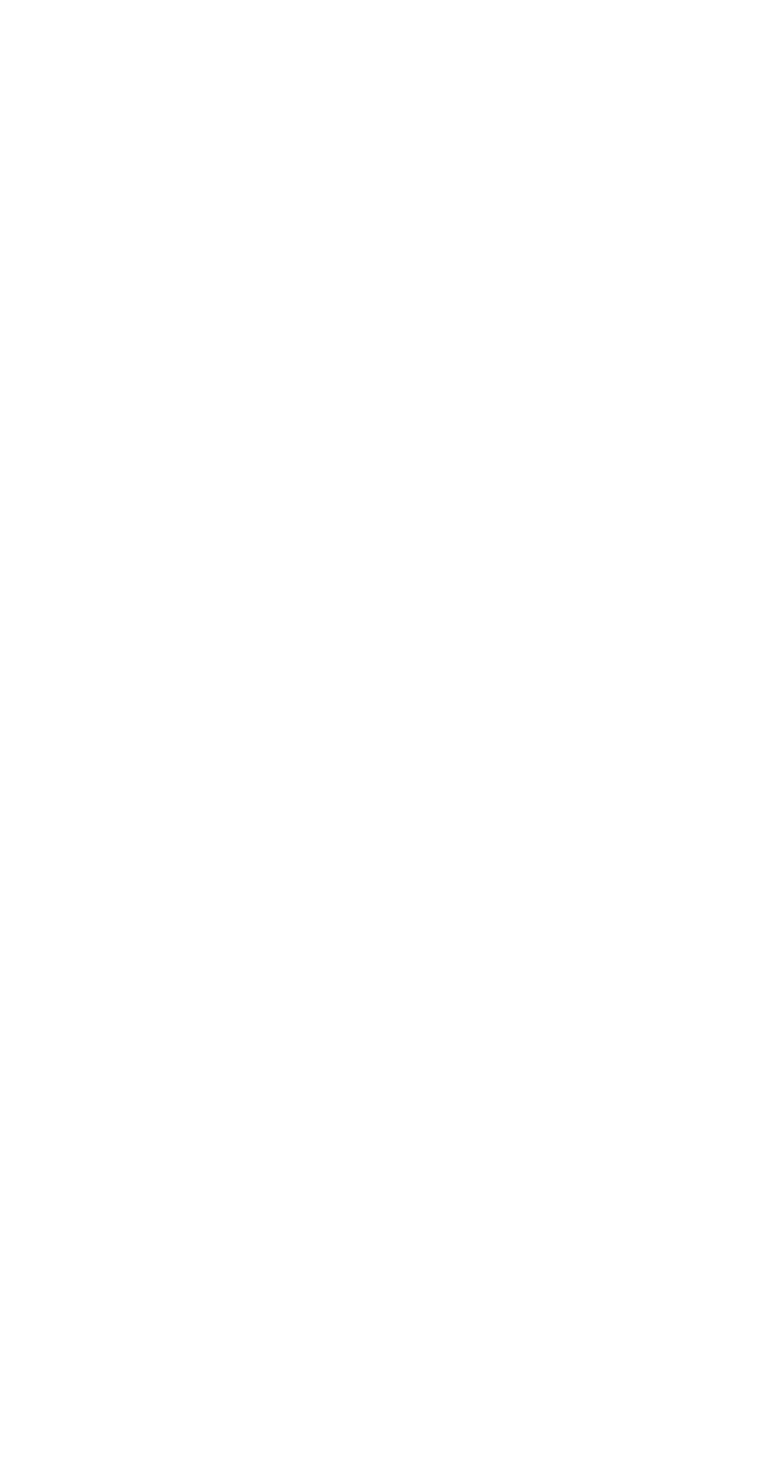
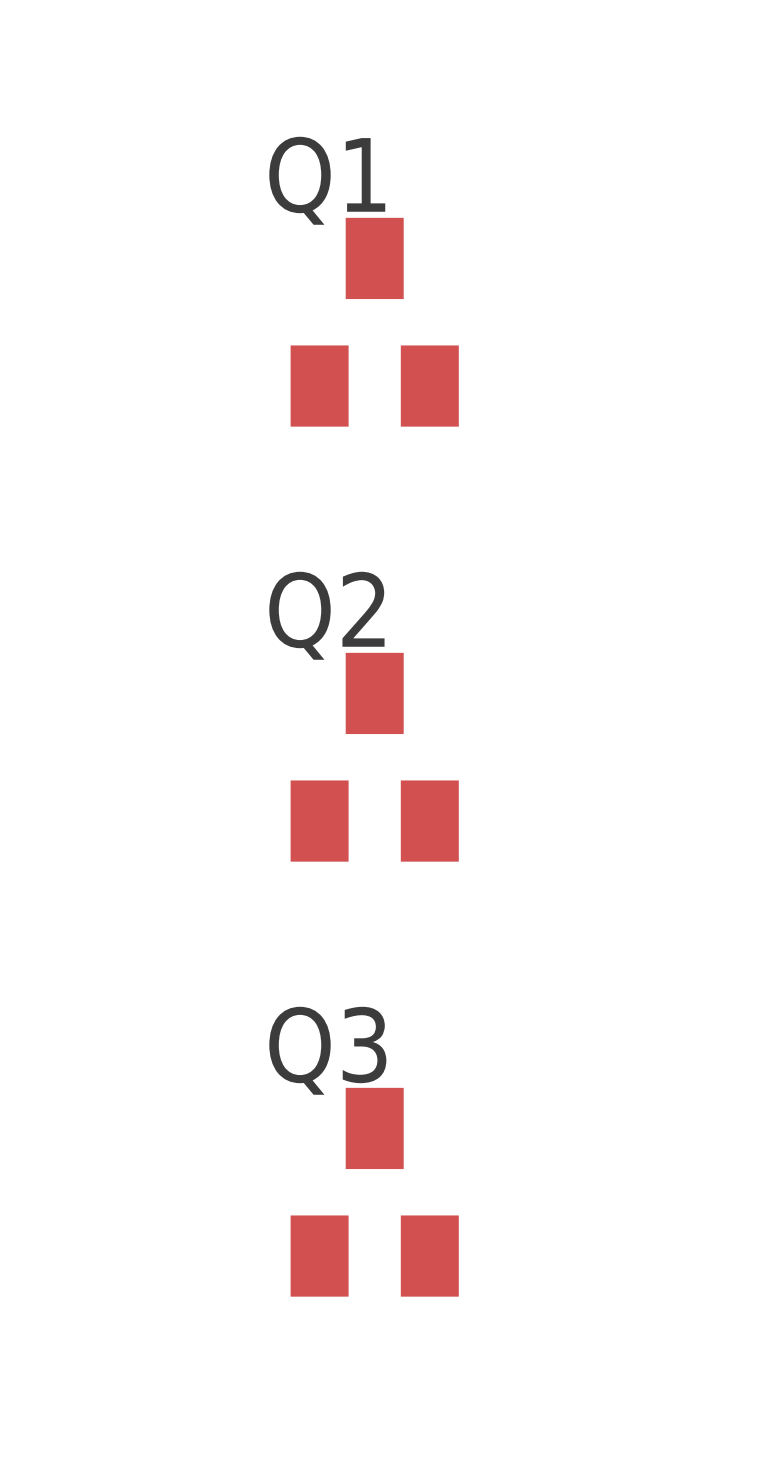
Q1: none -> (374, 322)
Q2: none -> (374, 757)
Q3: none -> (374, 1192)

